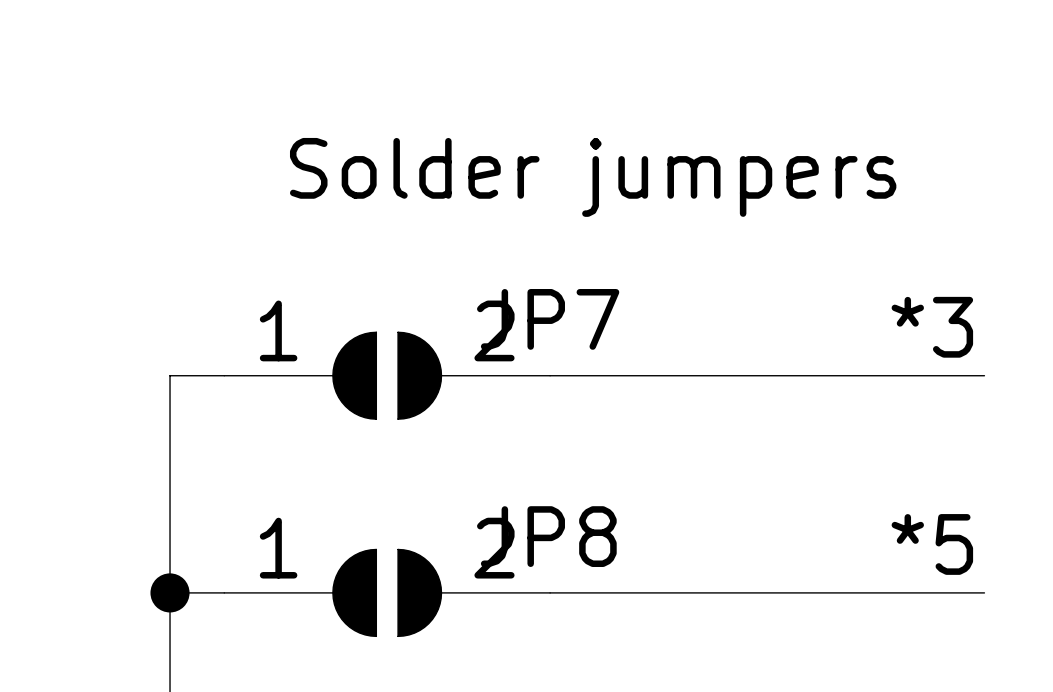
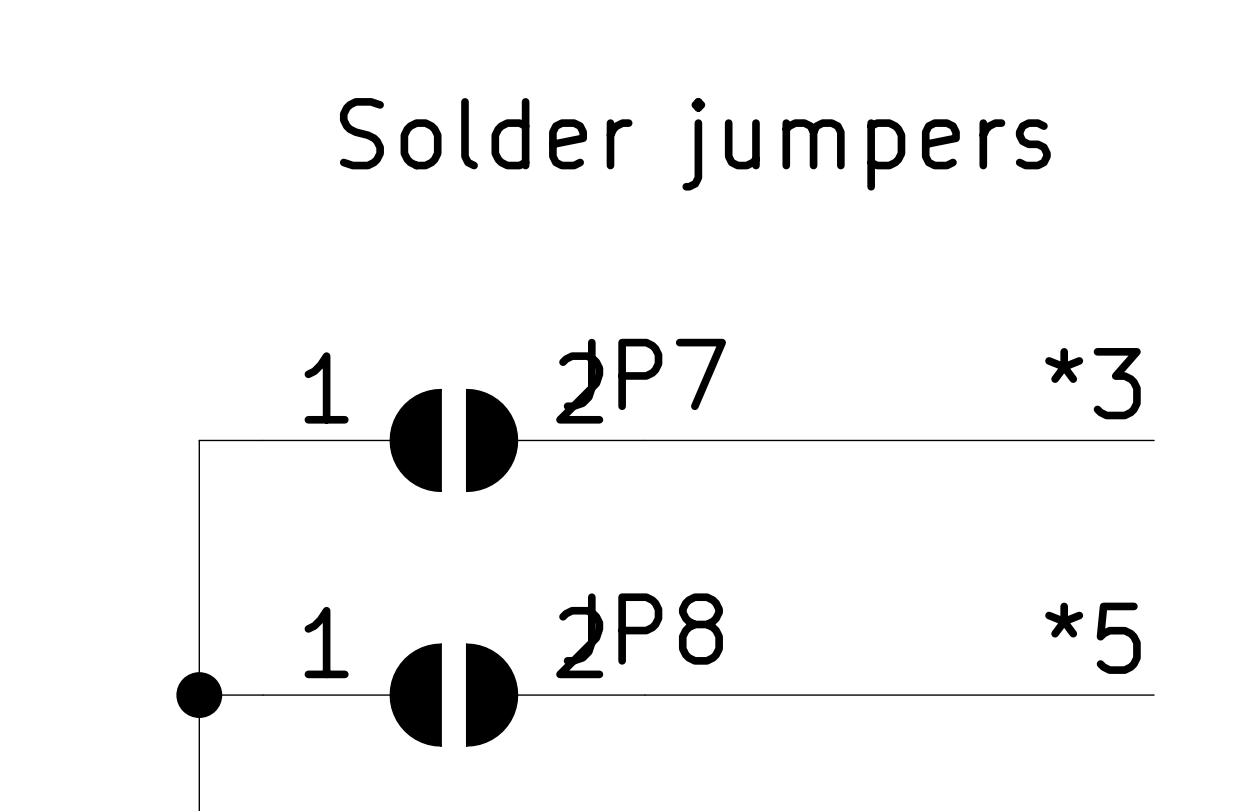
text position: Solder jumpers (593, 177) -> Solder jumpers (695, 144)

